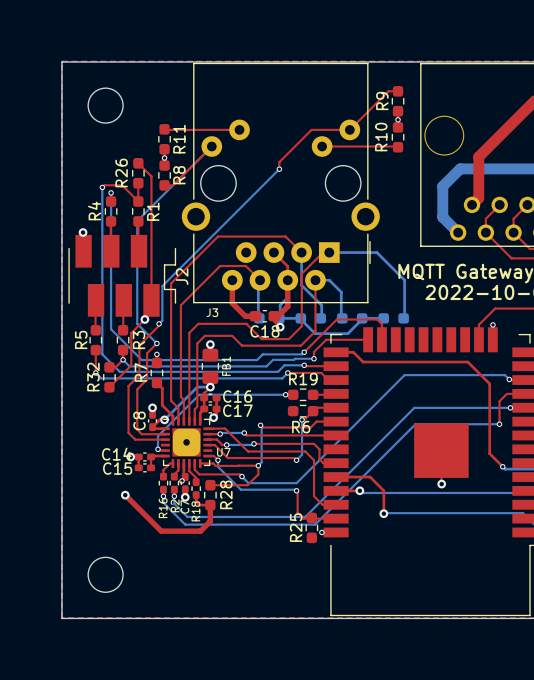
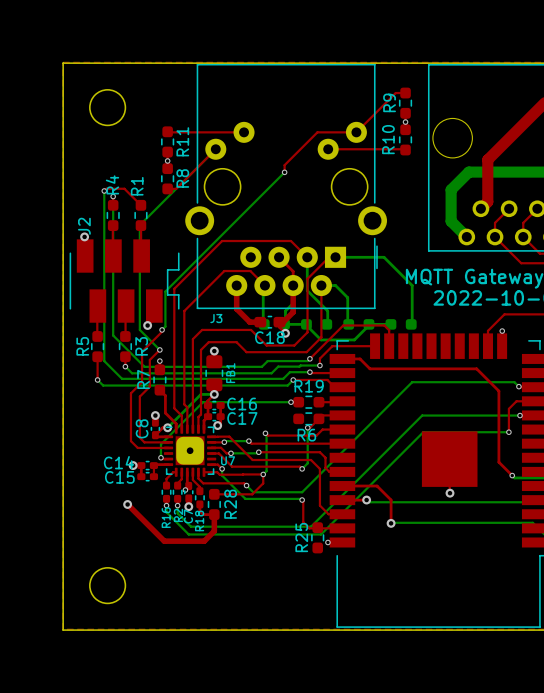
top track: (138, 163) (151, 176) (151, 300) -> none
R26: (138, 173) -> none
top track: (138, 183) (138, 201) -> none
R4 name position: R4 (94, 210) -> R4 (112, 184)
R1 name position: R1 (153, 211) -> R1 (137, 186)
J2 name position: J2 (182, 276) -> J2 (84, 226)
top track: (144, 319) (131, 333) (131, 365) (109, 387) -> none
top track: (123, 359) (115, 367) (109, 367) -> none
R32: (109, 377) -> none

